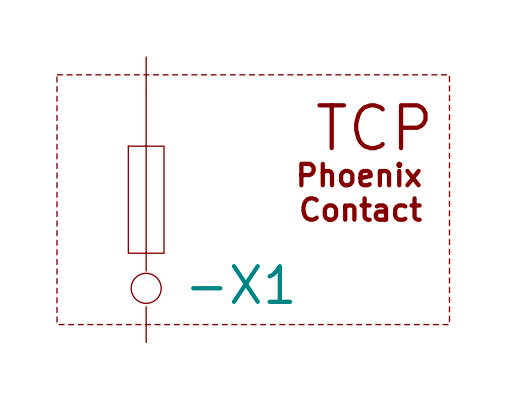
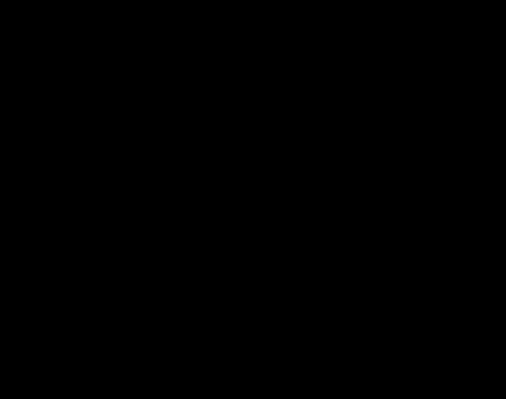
-X1: (253, 199) -> none

